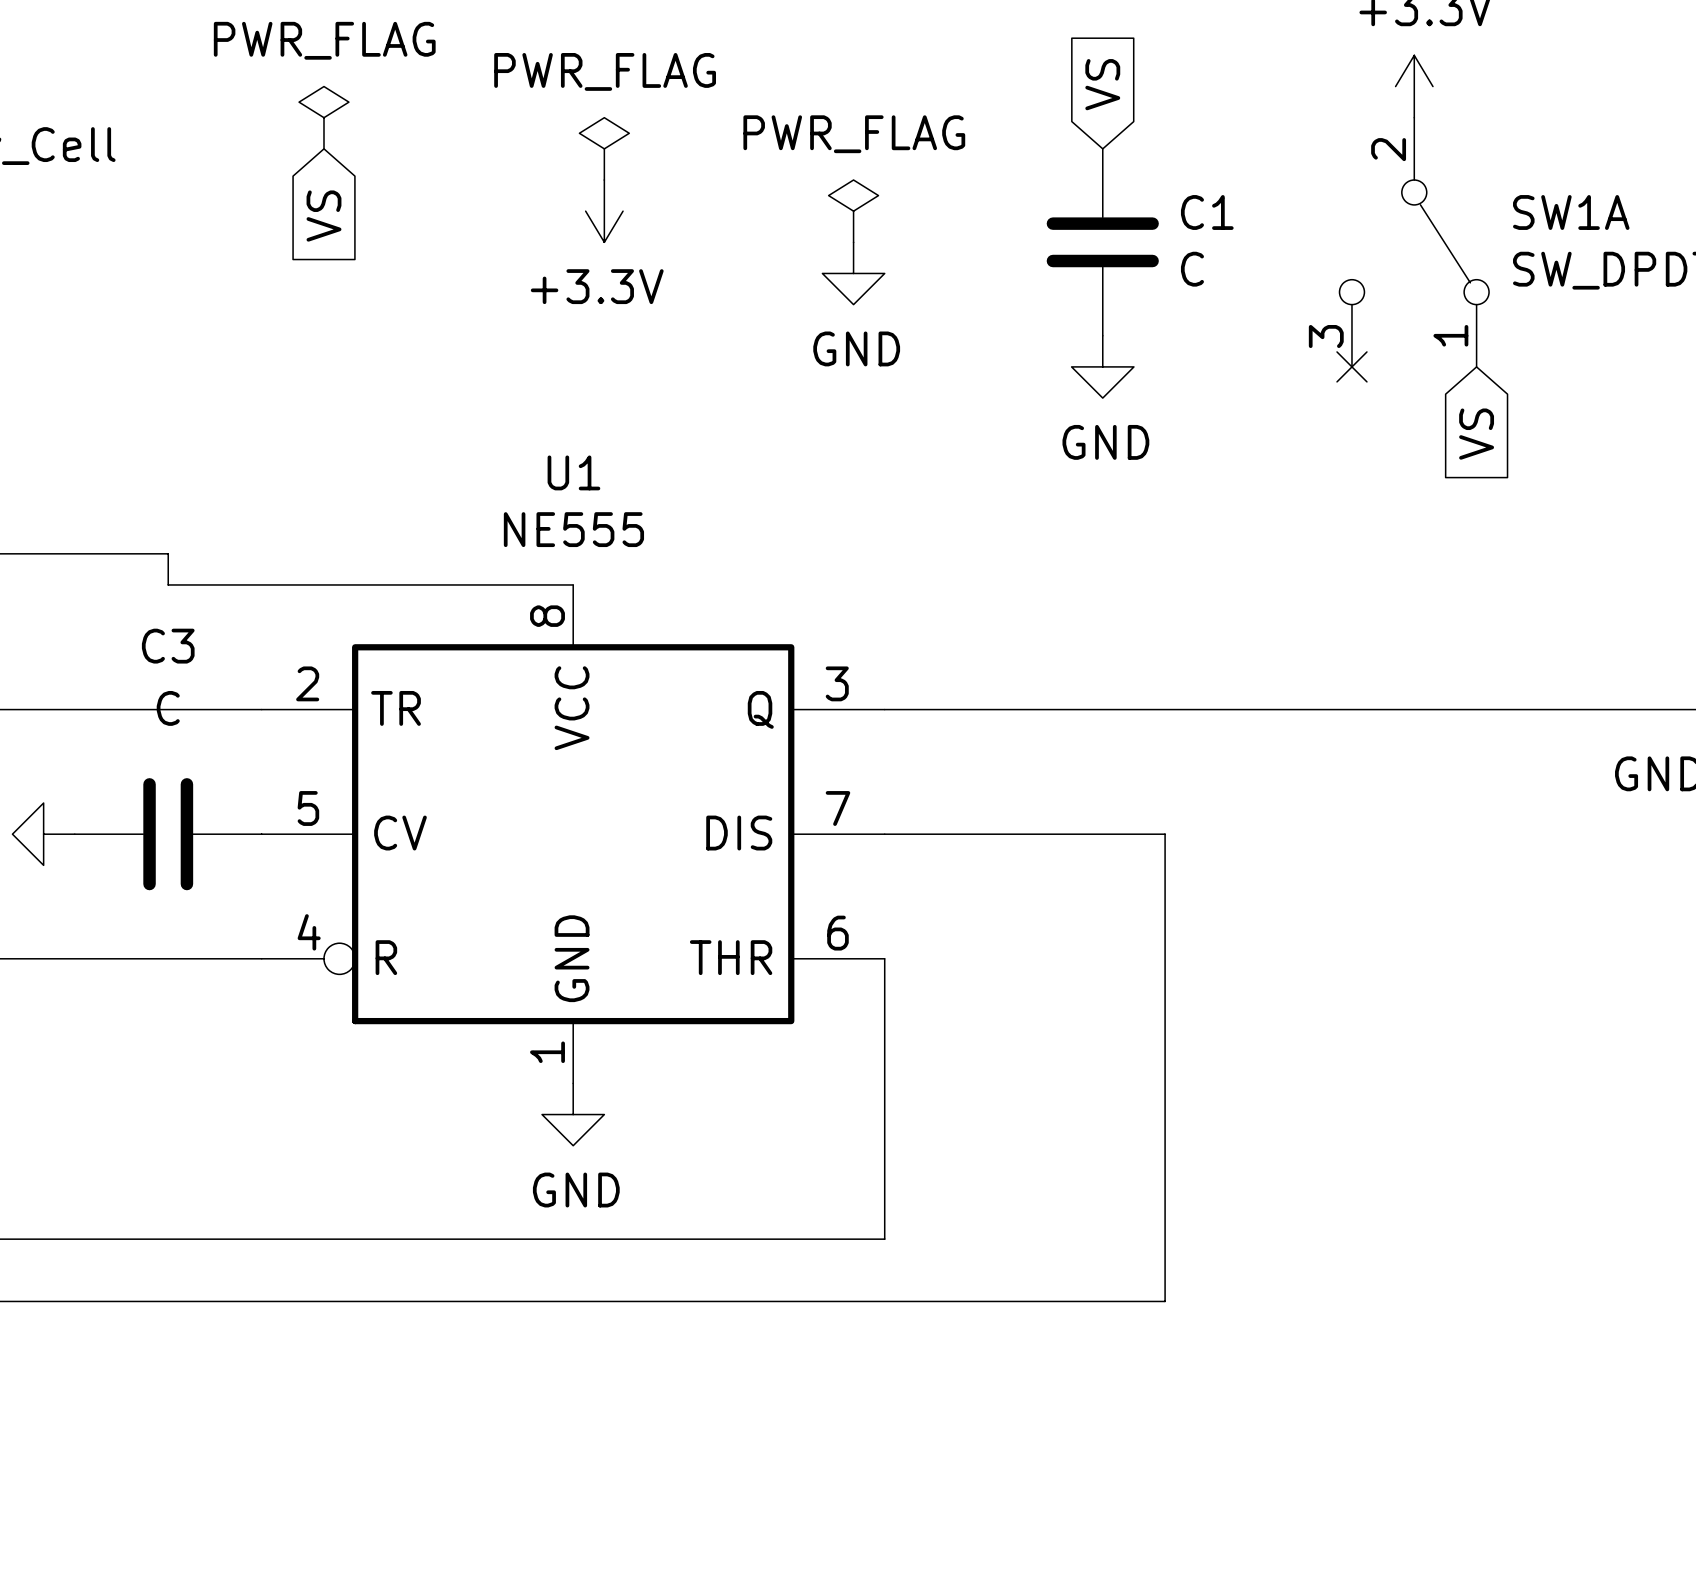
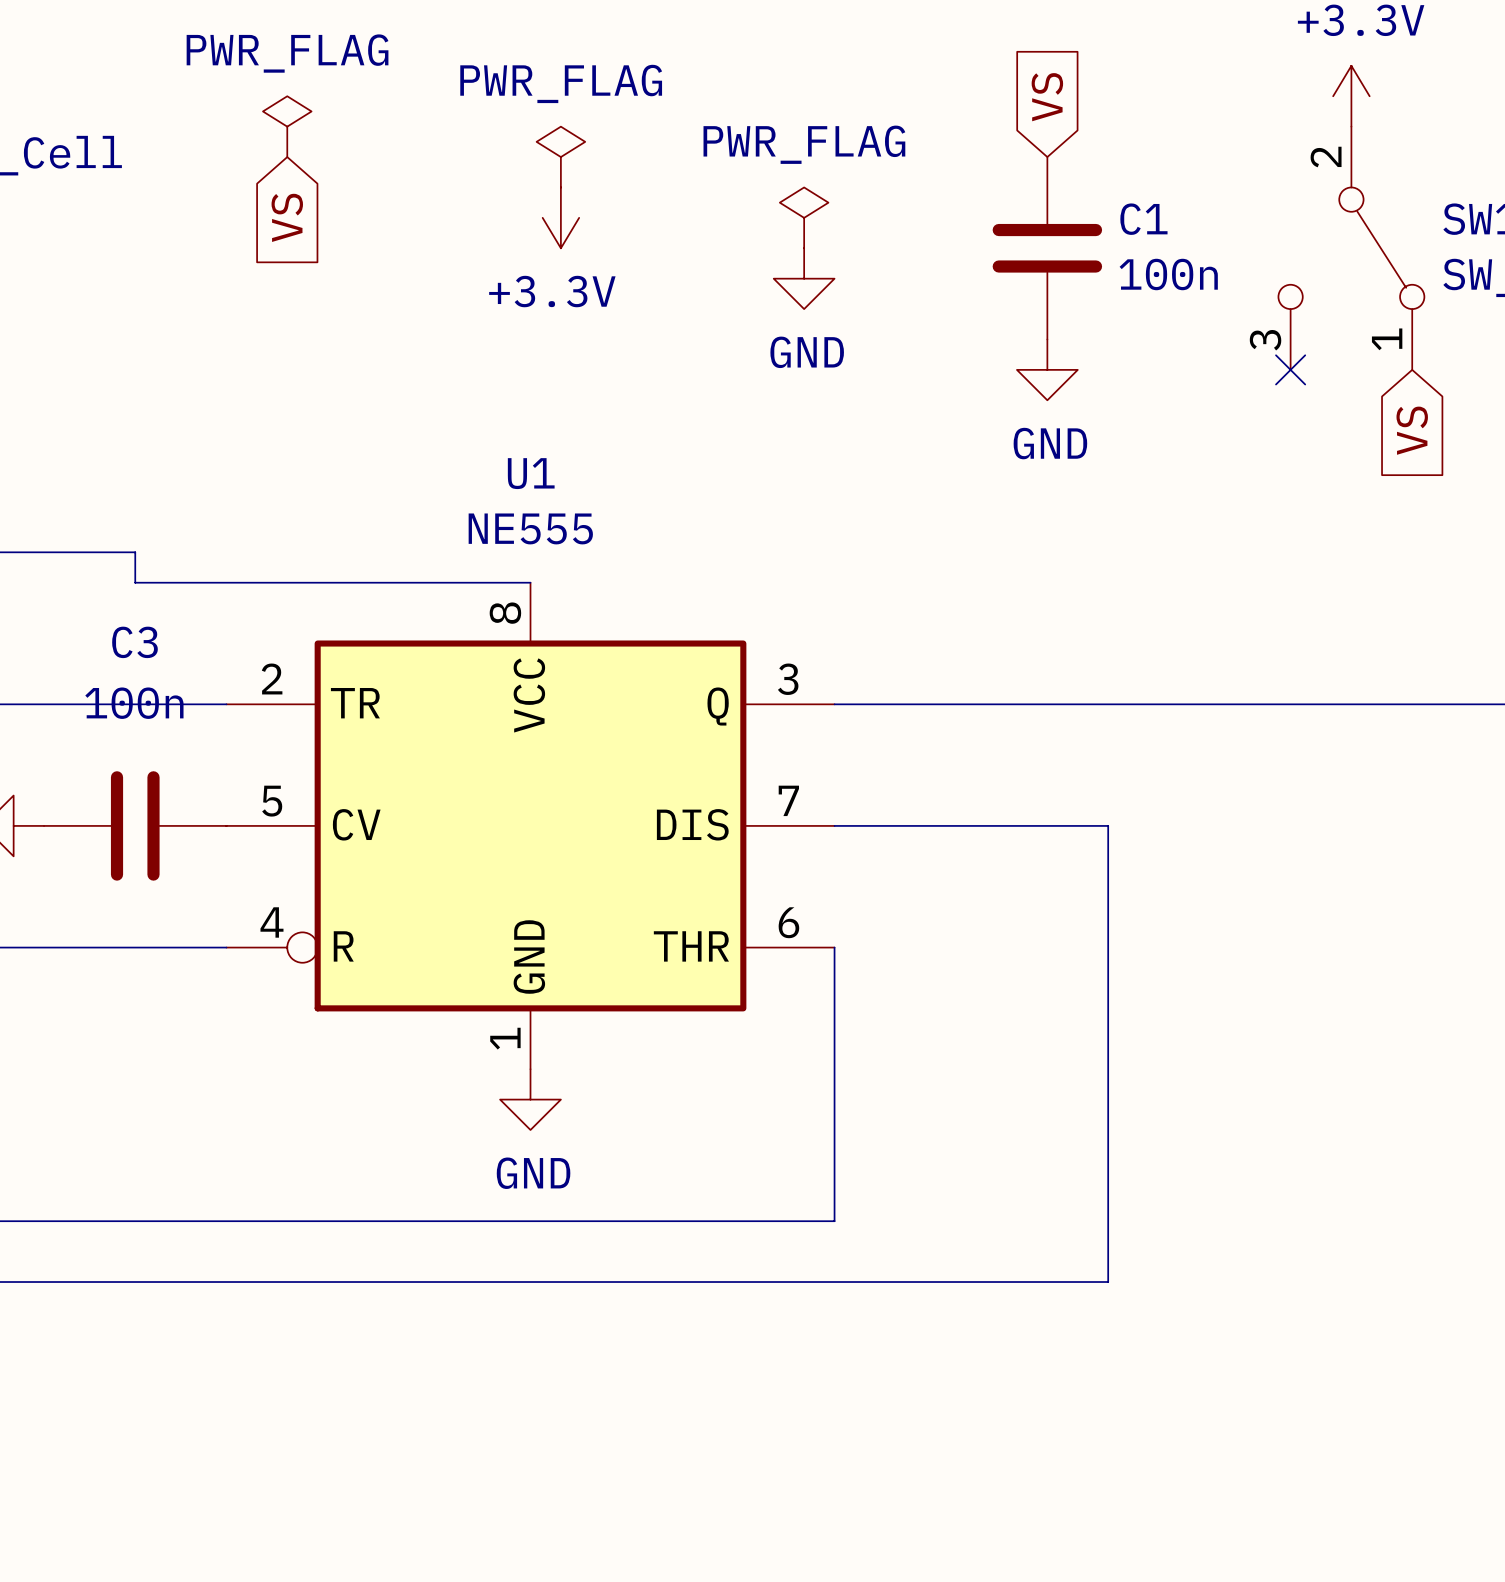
C1 value: C (1192, 269) -> 100n (1168, 274)
C3 value: C (168, 708) -> 100n (134, 703)

